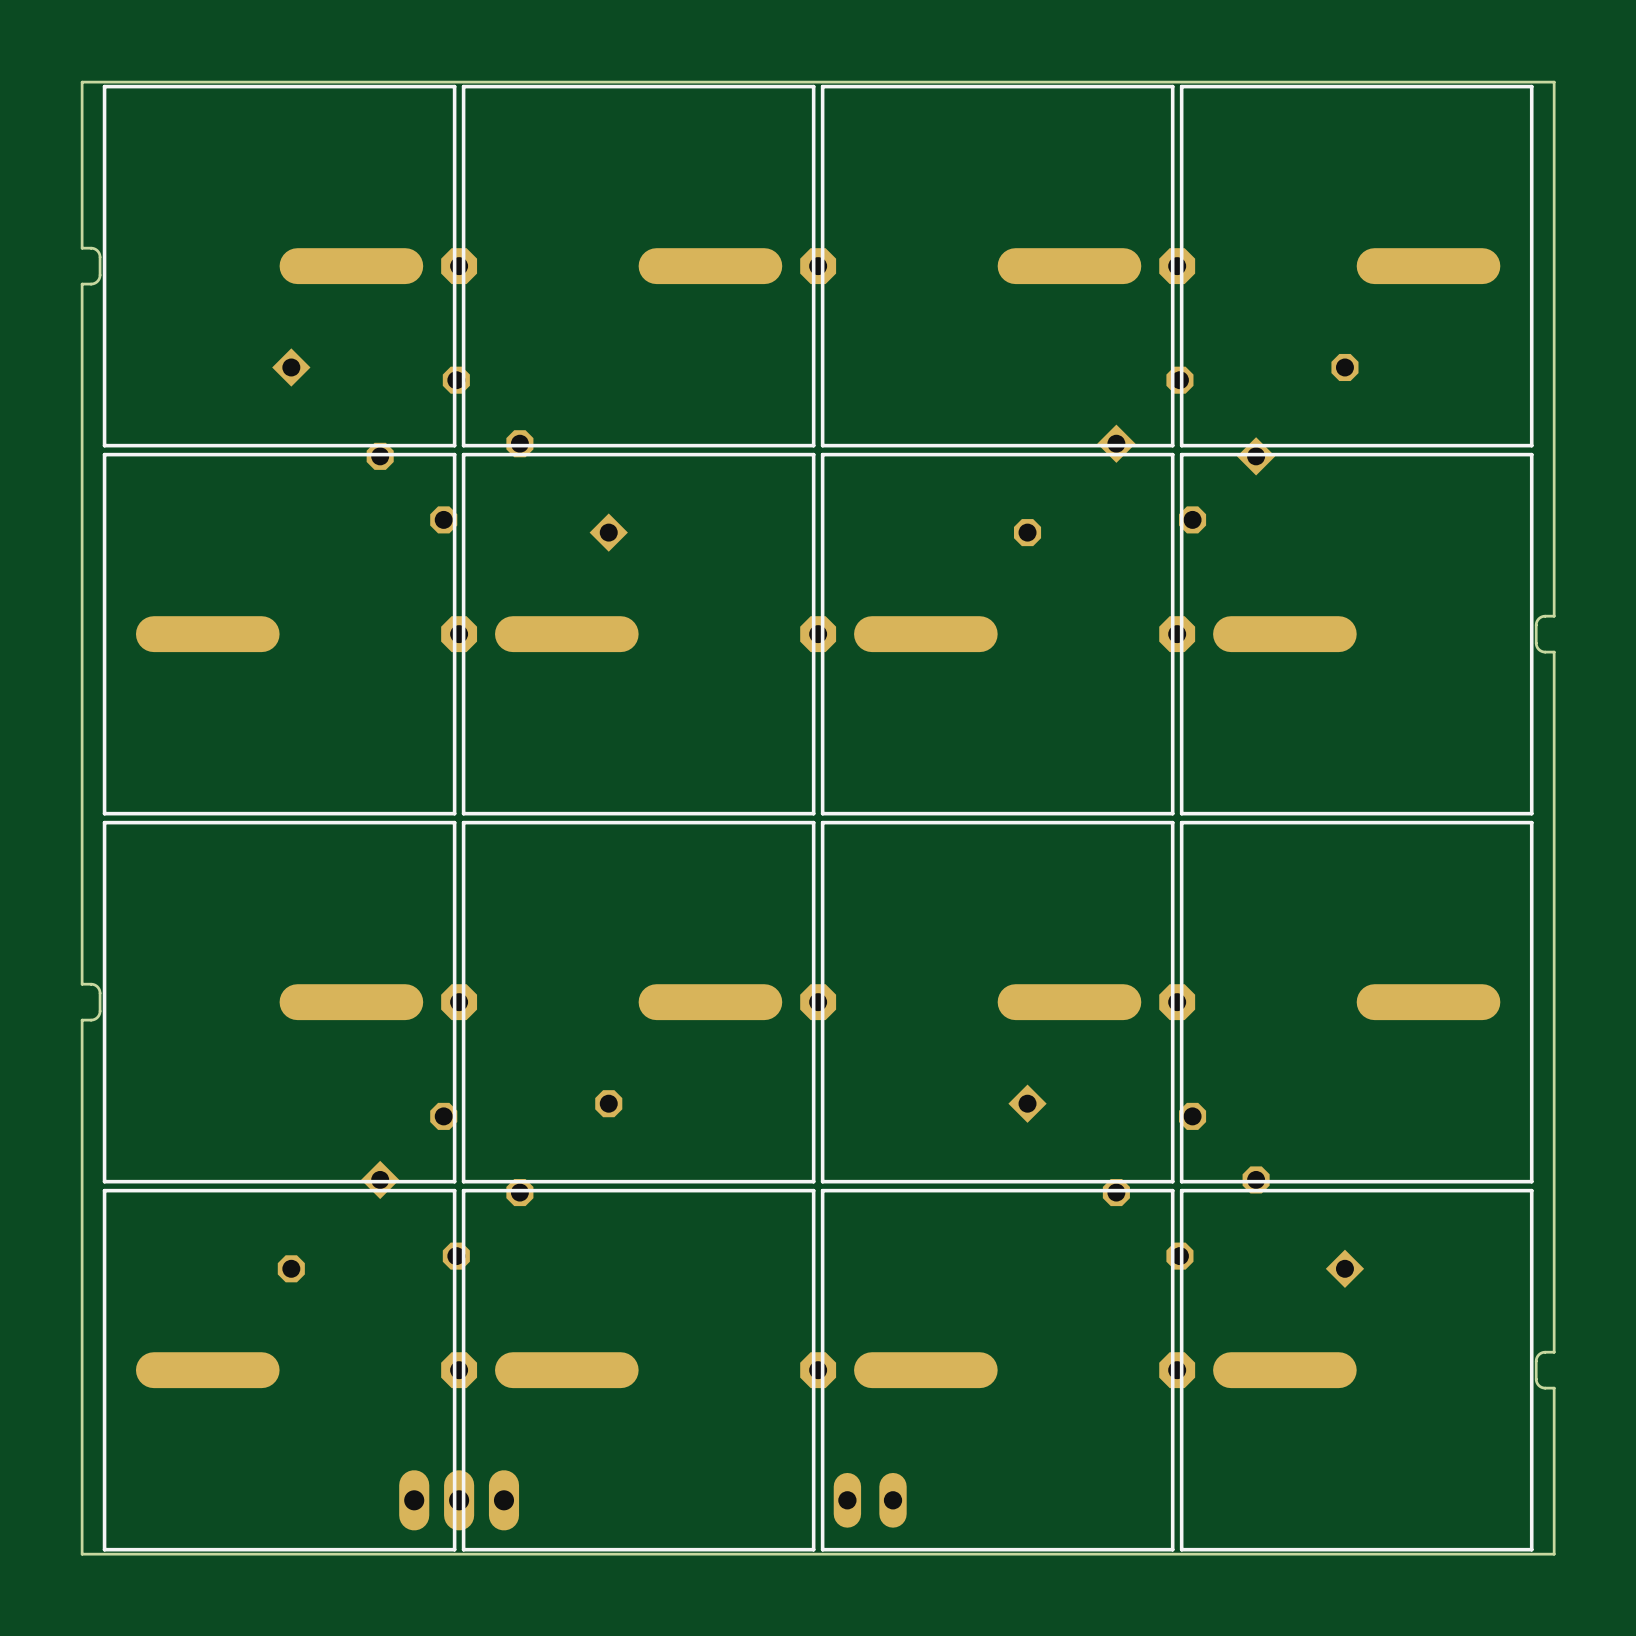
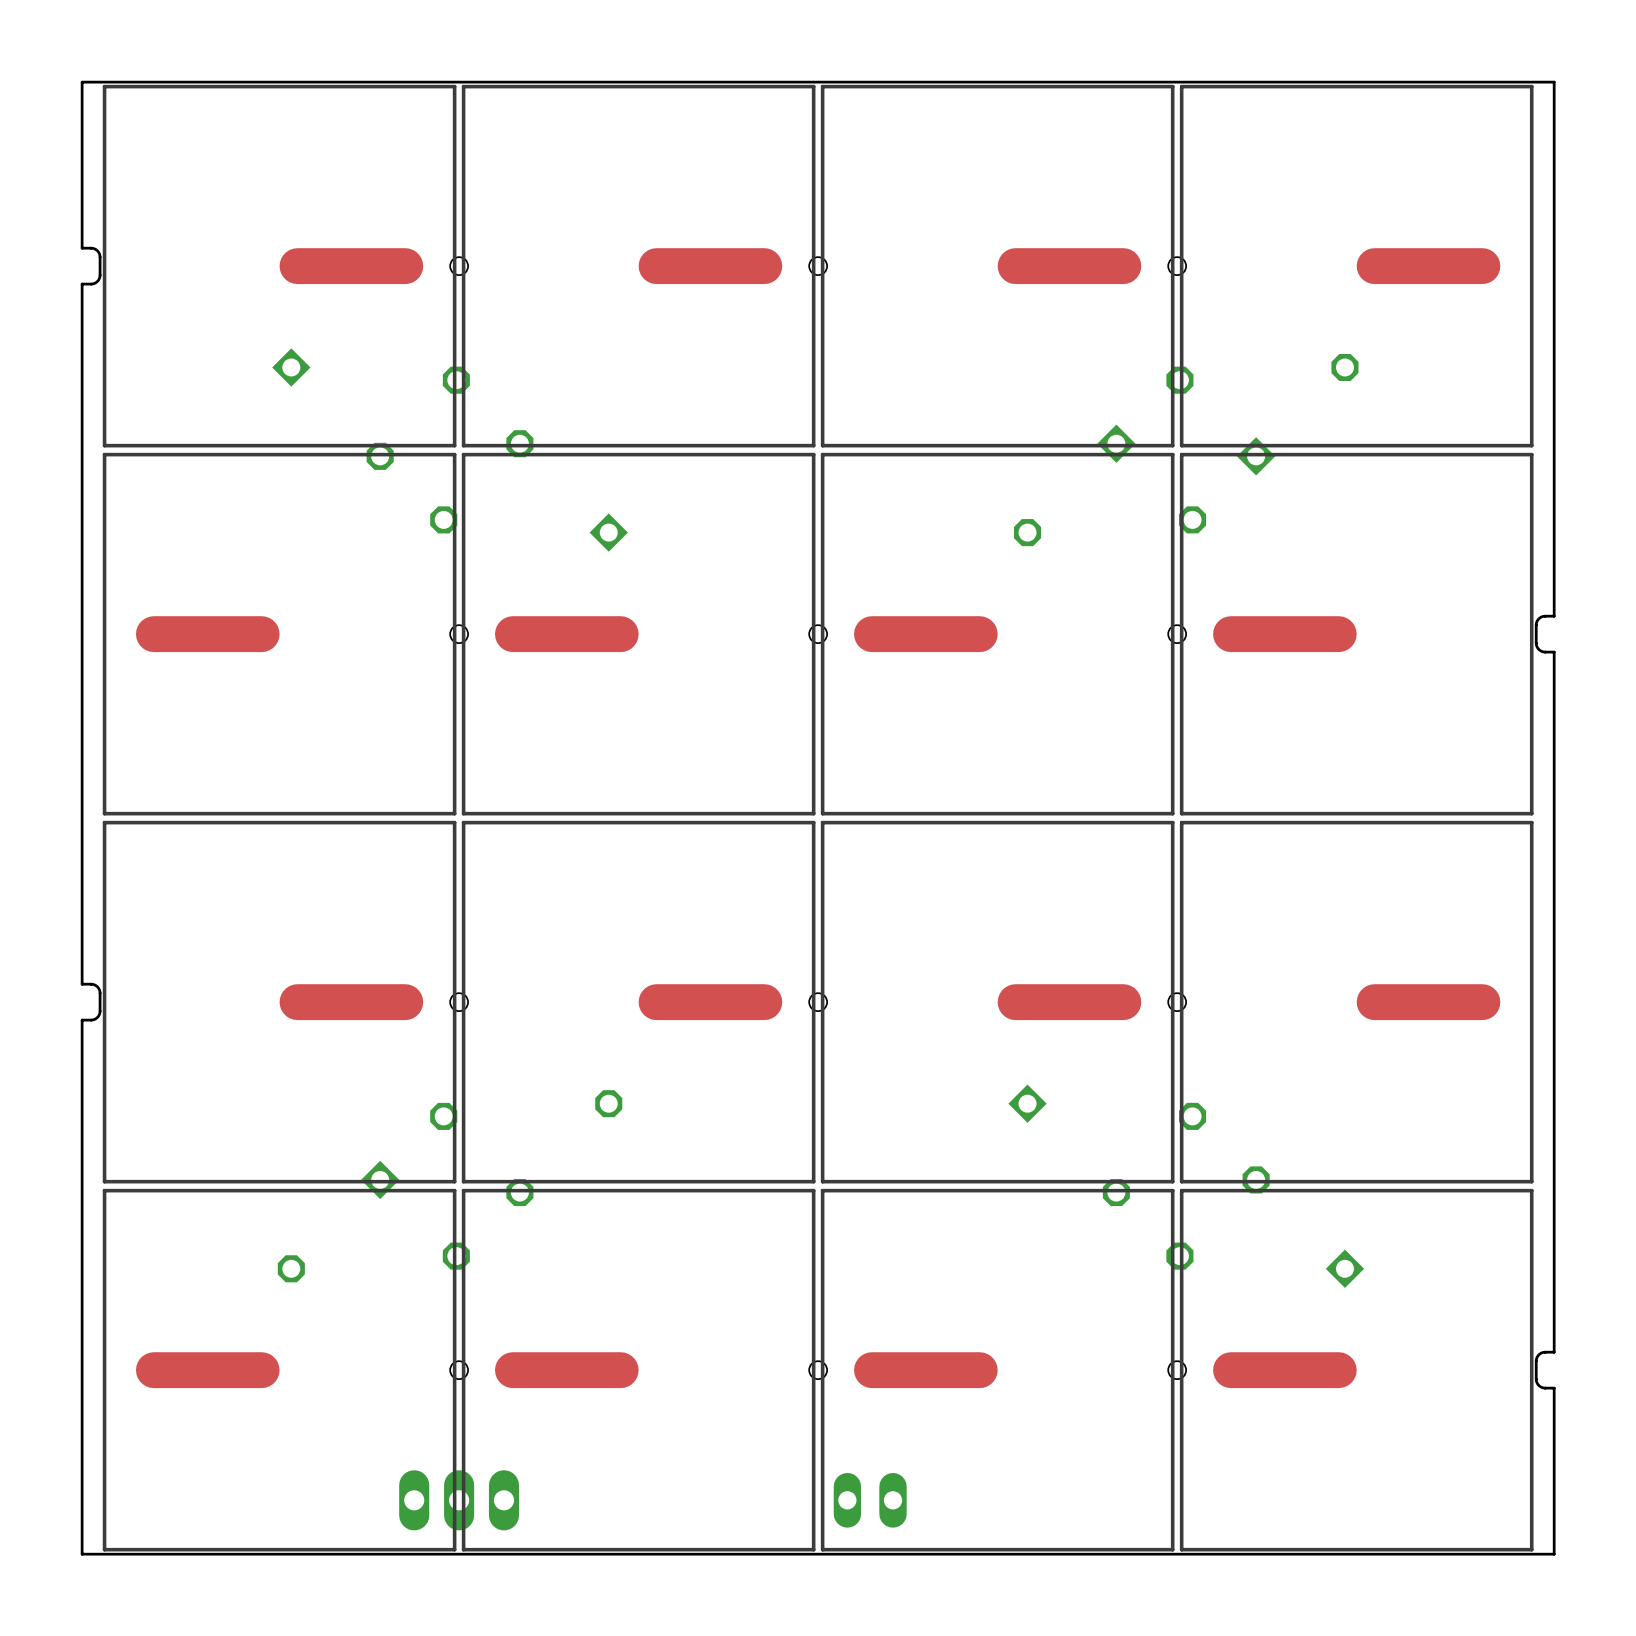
part footprint: [441, 84, 816, 448] -> [450, 84, 816, 448]
part footprint: [800, 84, 1175, 448] -> [809, 84, 1175, 448]
part footprint: [1159, 84, 1534, 448] -> [1168, 84, 1534, 448]
part footprint: [102, 452, 478, 816] -> [102, 452, 469, 816]
part footprint: [461, 452, 837, 816] -> [461, 452, 828, 816]
part footprint: [820, 452, 1196, 816] -> [820, 452, 1187, 816]
part footprint: [441, 820, 816, 1184] -> [450, 820, 816, 1184]
part footprint: [800, 820, 1175, 1184] -> [809, 820, 1175, 1184]
part footprint: [1159, 820, 1534, 1184] -> [1168, 820, 1534, 1184]
part footprint: [102, 1188, 478, 1552] -> [102, 1188, 469, 1552]
part footprint: [461, 1188, 837, 1552] -> [461, 1188, 828, 1552]
part footprint: [820, 1188, 1196, 1552] -> [820, 1188, 1187, 1552]

